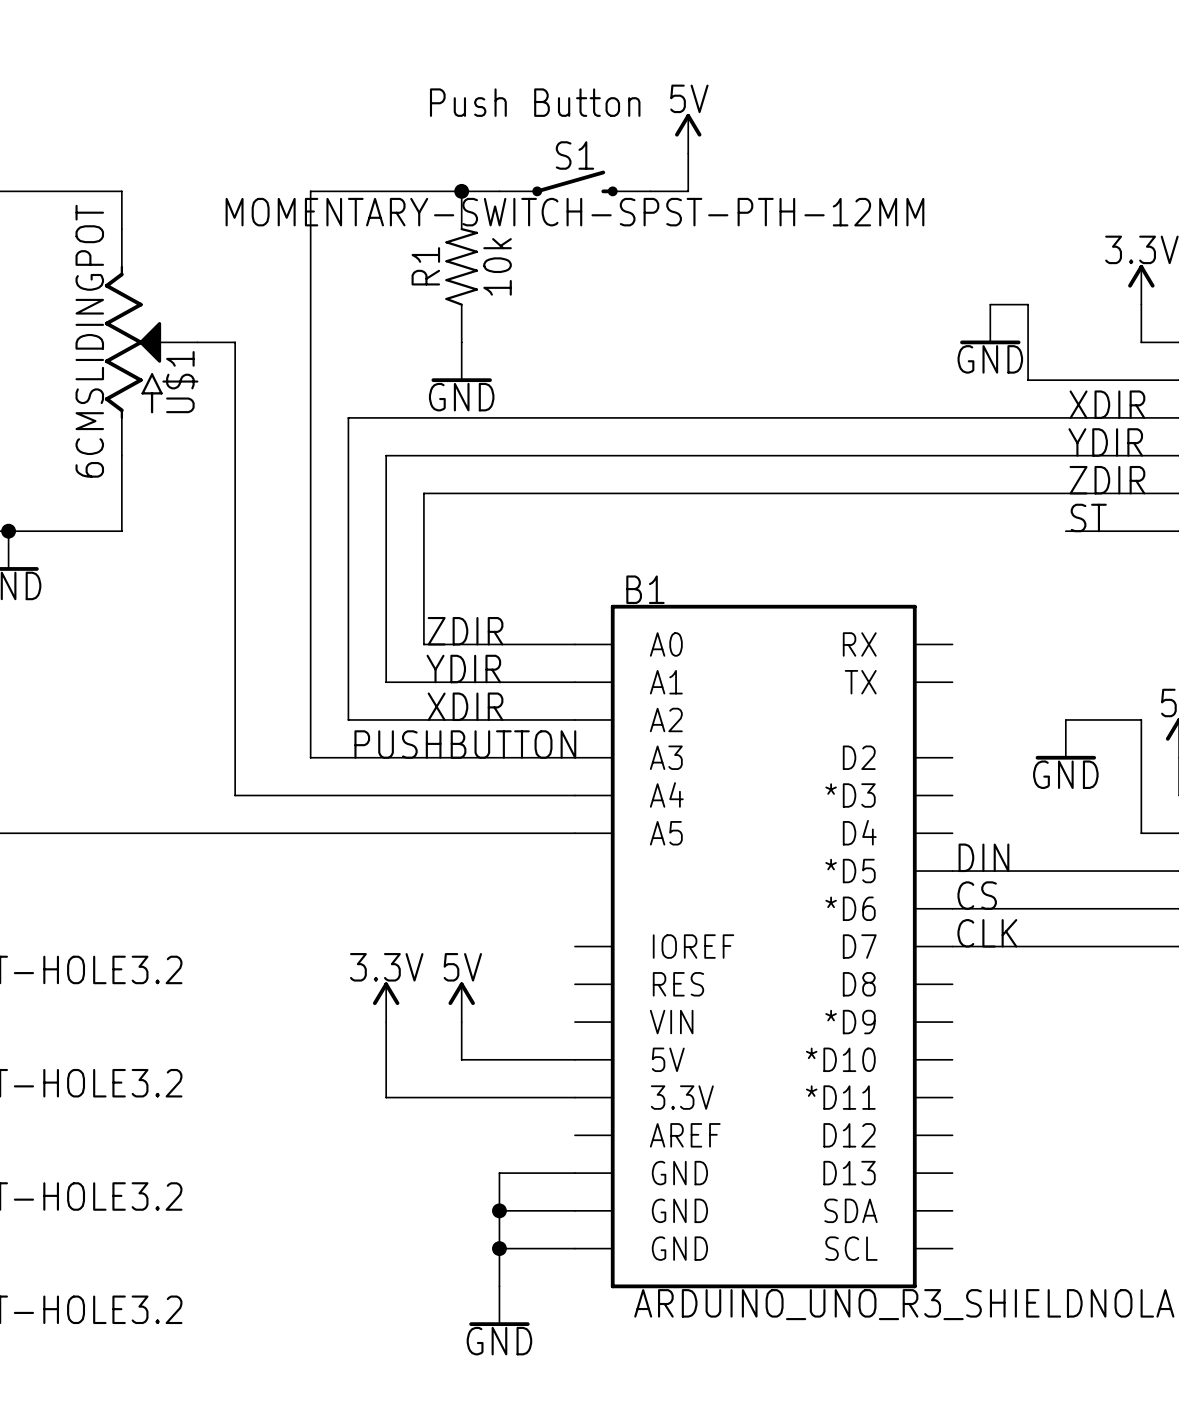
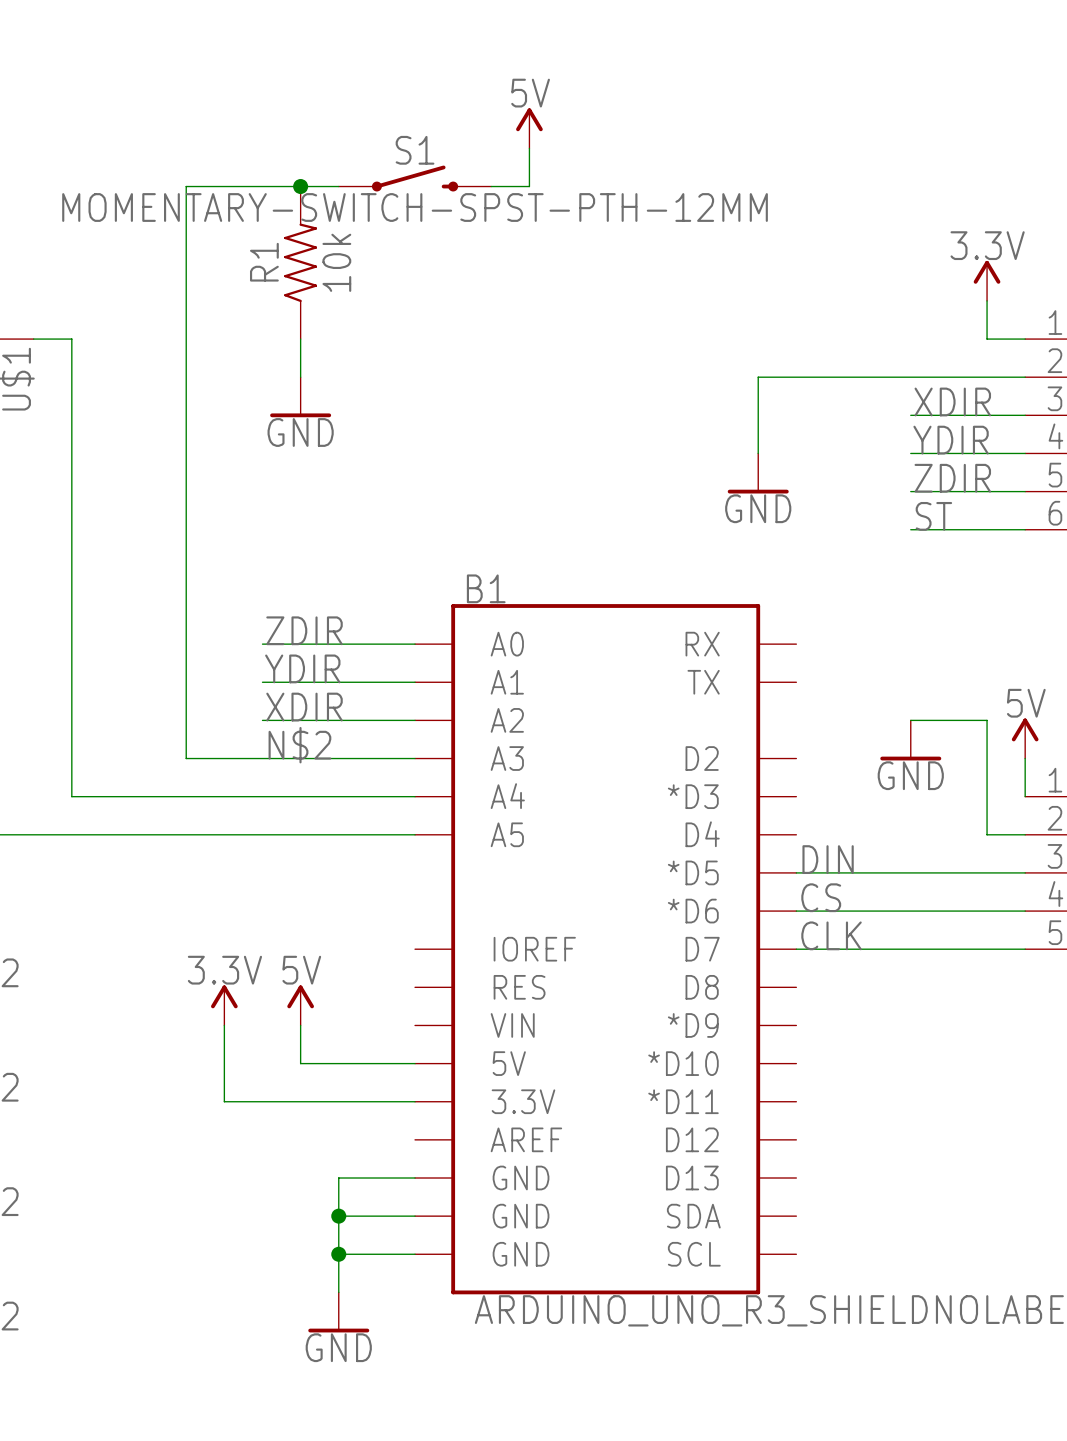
text: Push Button (535, 102) -> none
wire: (348, 191) (310, 191) (310, 757) (348, 757) -> (186, 186) (186, 415)
wire: (990, 304) (1028, 304) (1028, 380) -> (758, 453) (758, 377) (872, 377)
power symbol position: GND (990, 324) -> GND (758, 473)
power symbol position: GND (461, 362) -> GND (300, 397)
wire: (348, 417) (1065, 417) -> none
wire: (1065, 455) (386, 455) (386, 682) (423, 682) -> none
wire: (1065, 493) (423, 493) (423, 644) -> none
wire: (348, 719) (423, 719) -> (186, 720) (186, 758)
label: none -> N$2 (299, 745)
label: PUSHBUTTON (465, 744) -> none

